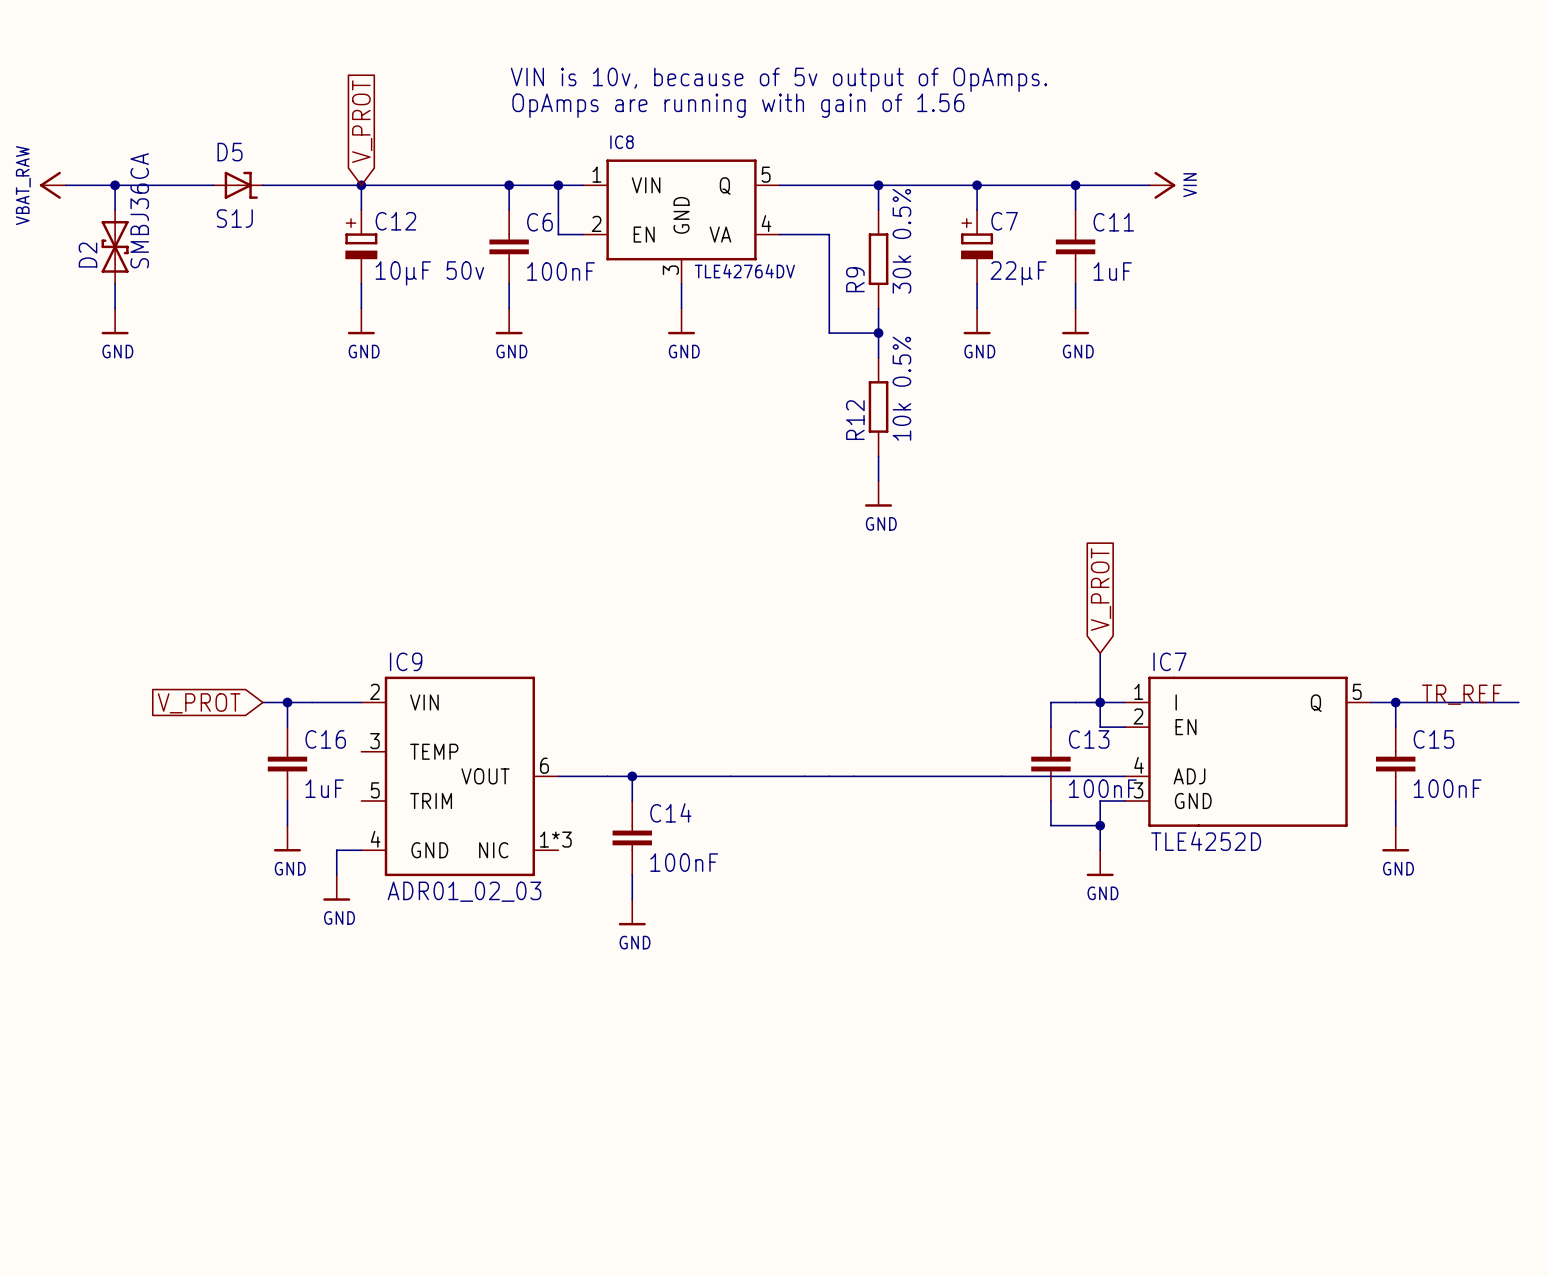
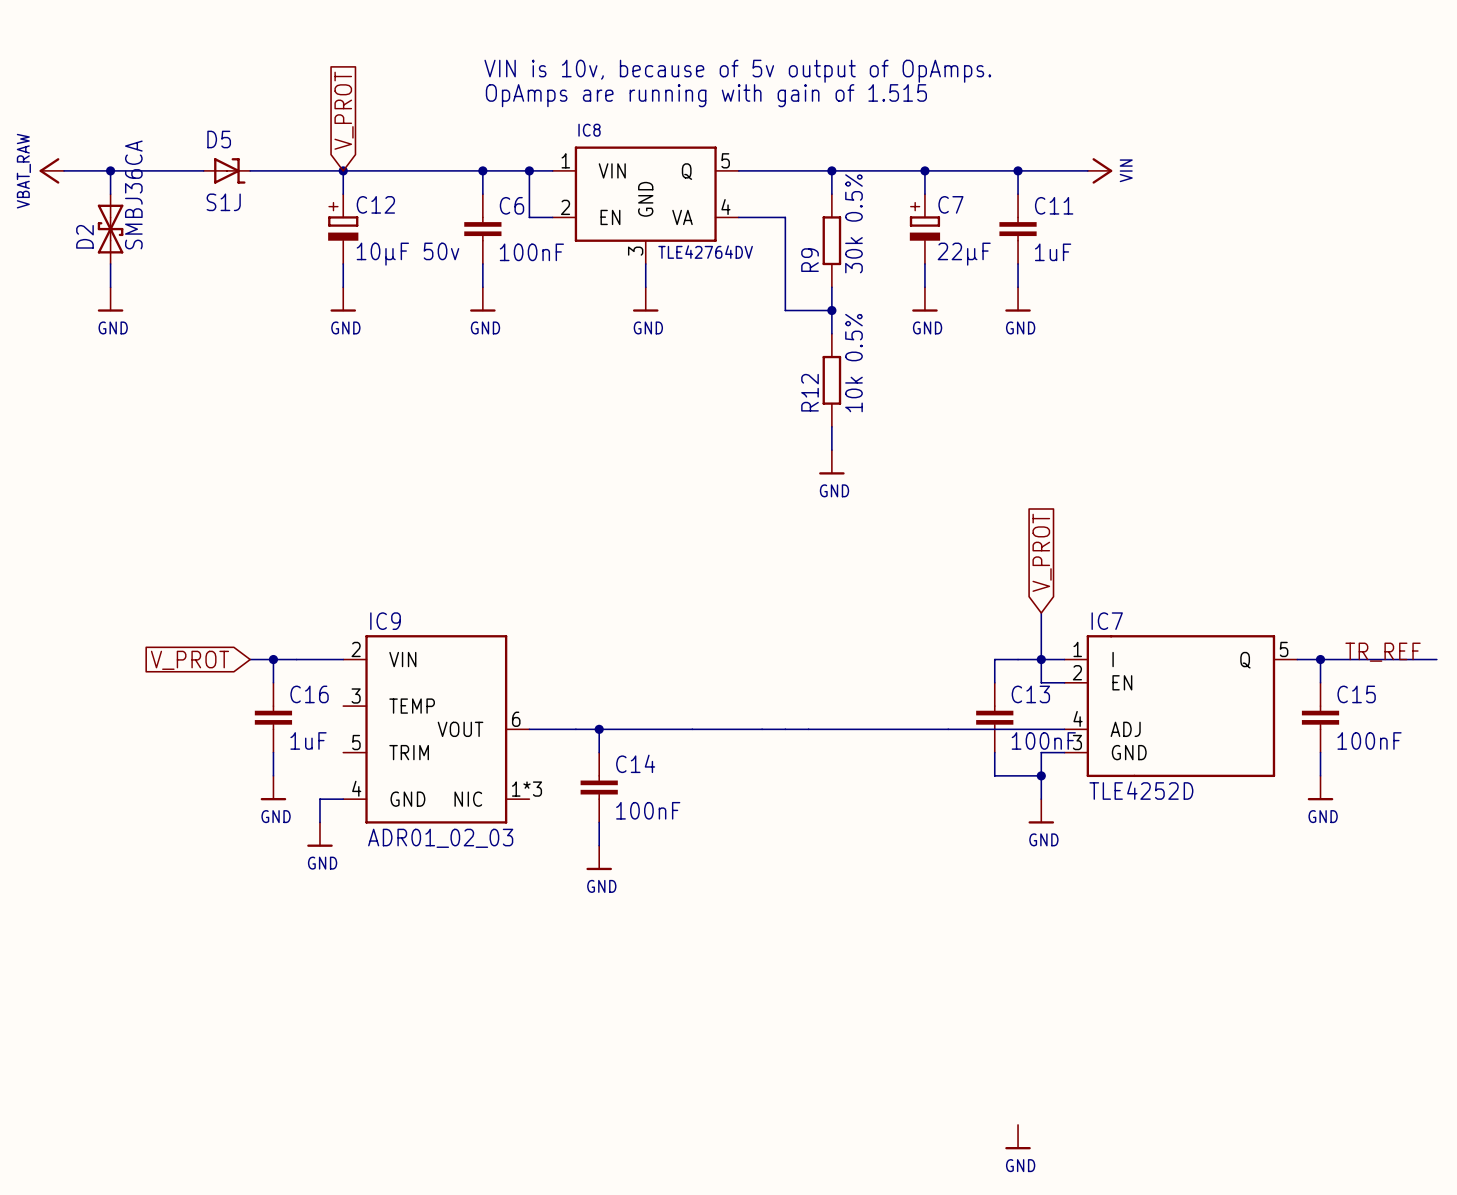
text: OpAmps are running with gain of 1.56 (738, 105) -> OpAmps are running with gain of 1.515 (706, 95)
power symbol: none -> GND (1018, 1137)

